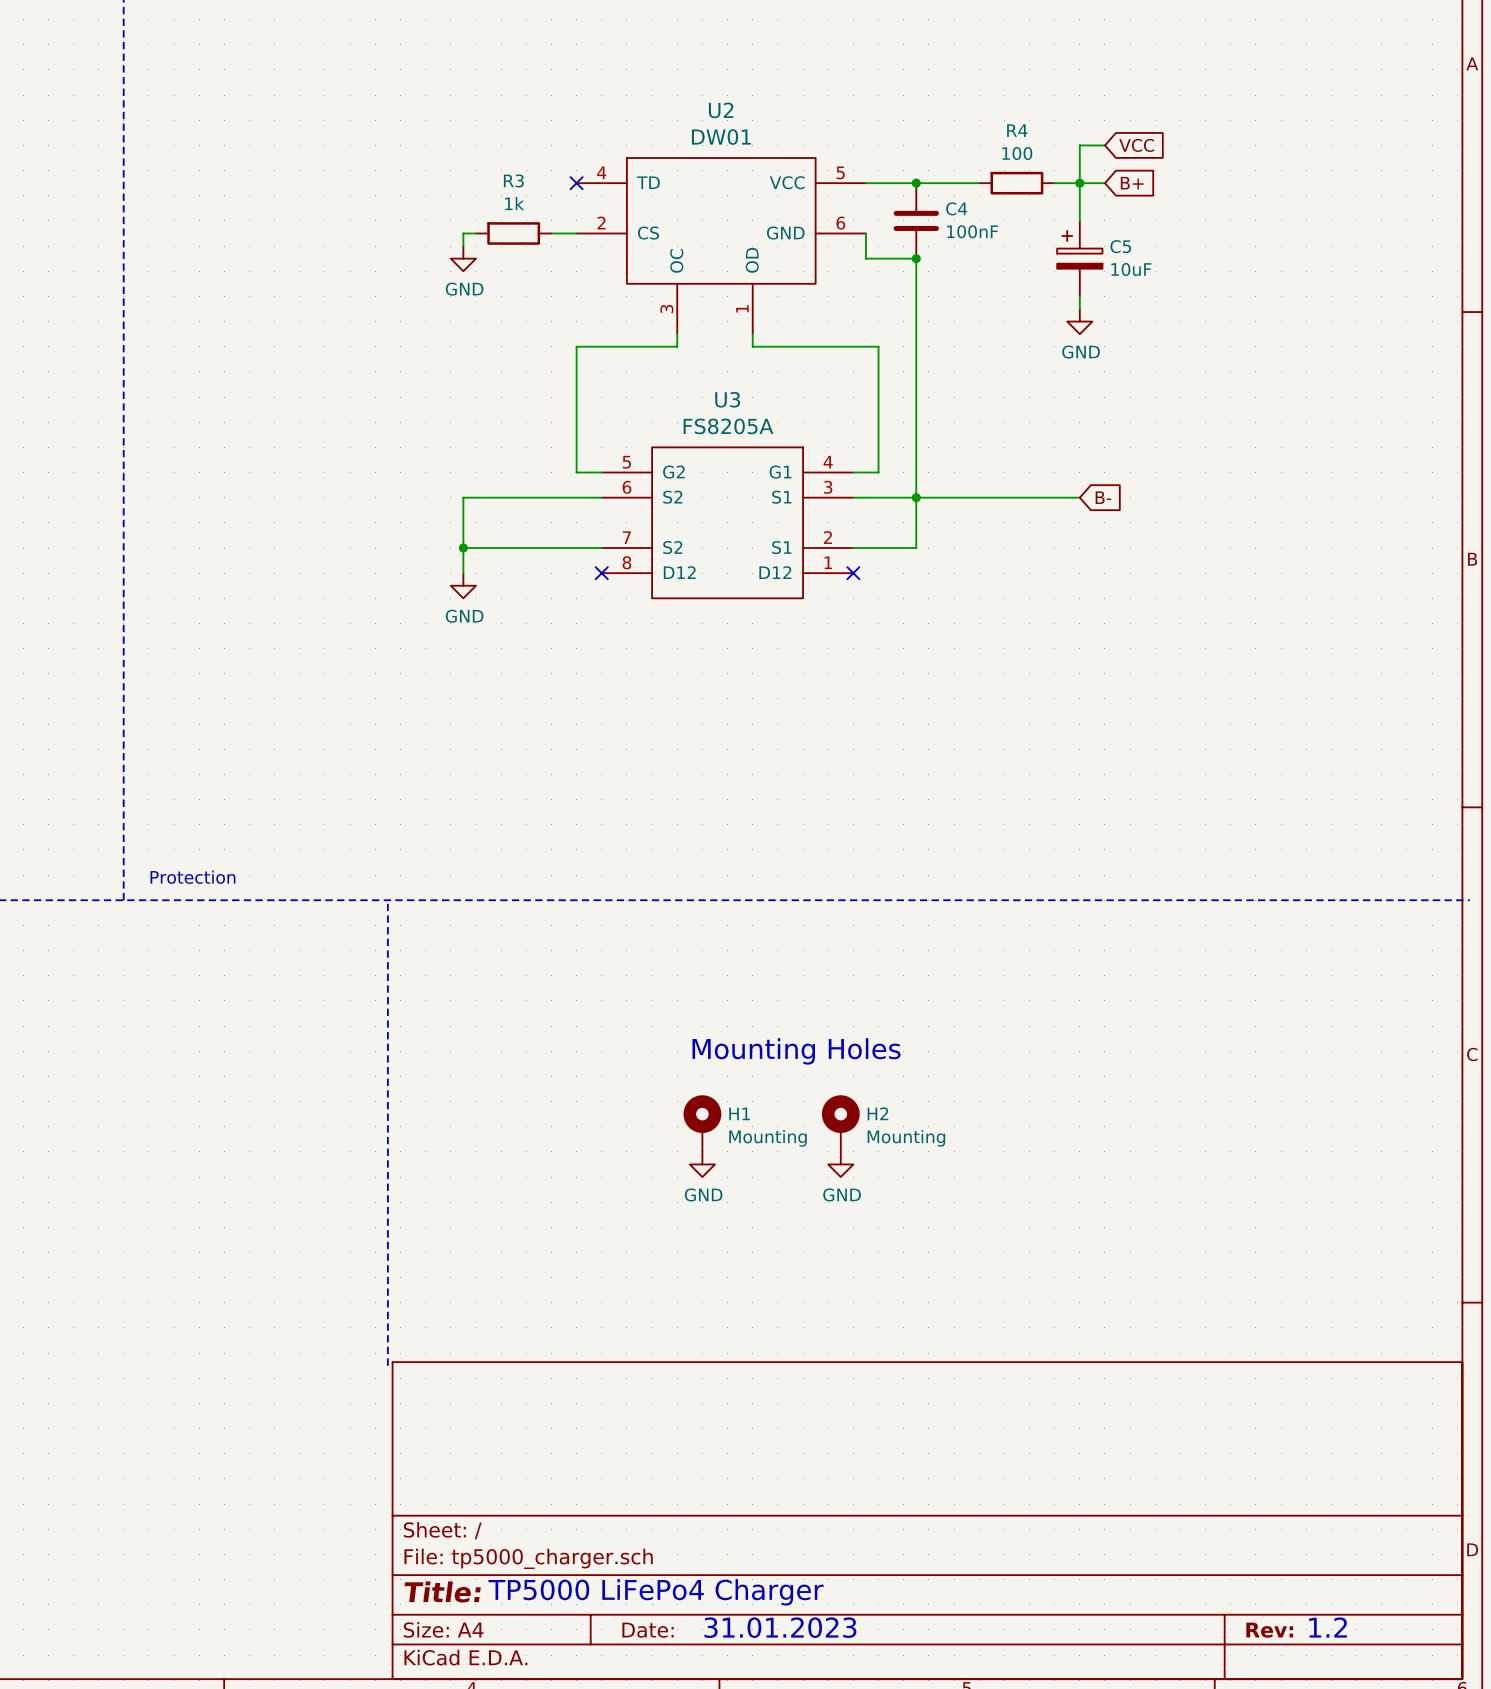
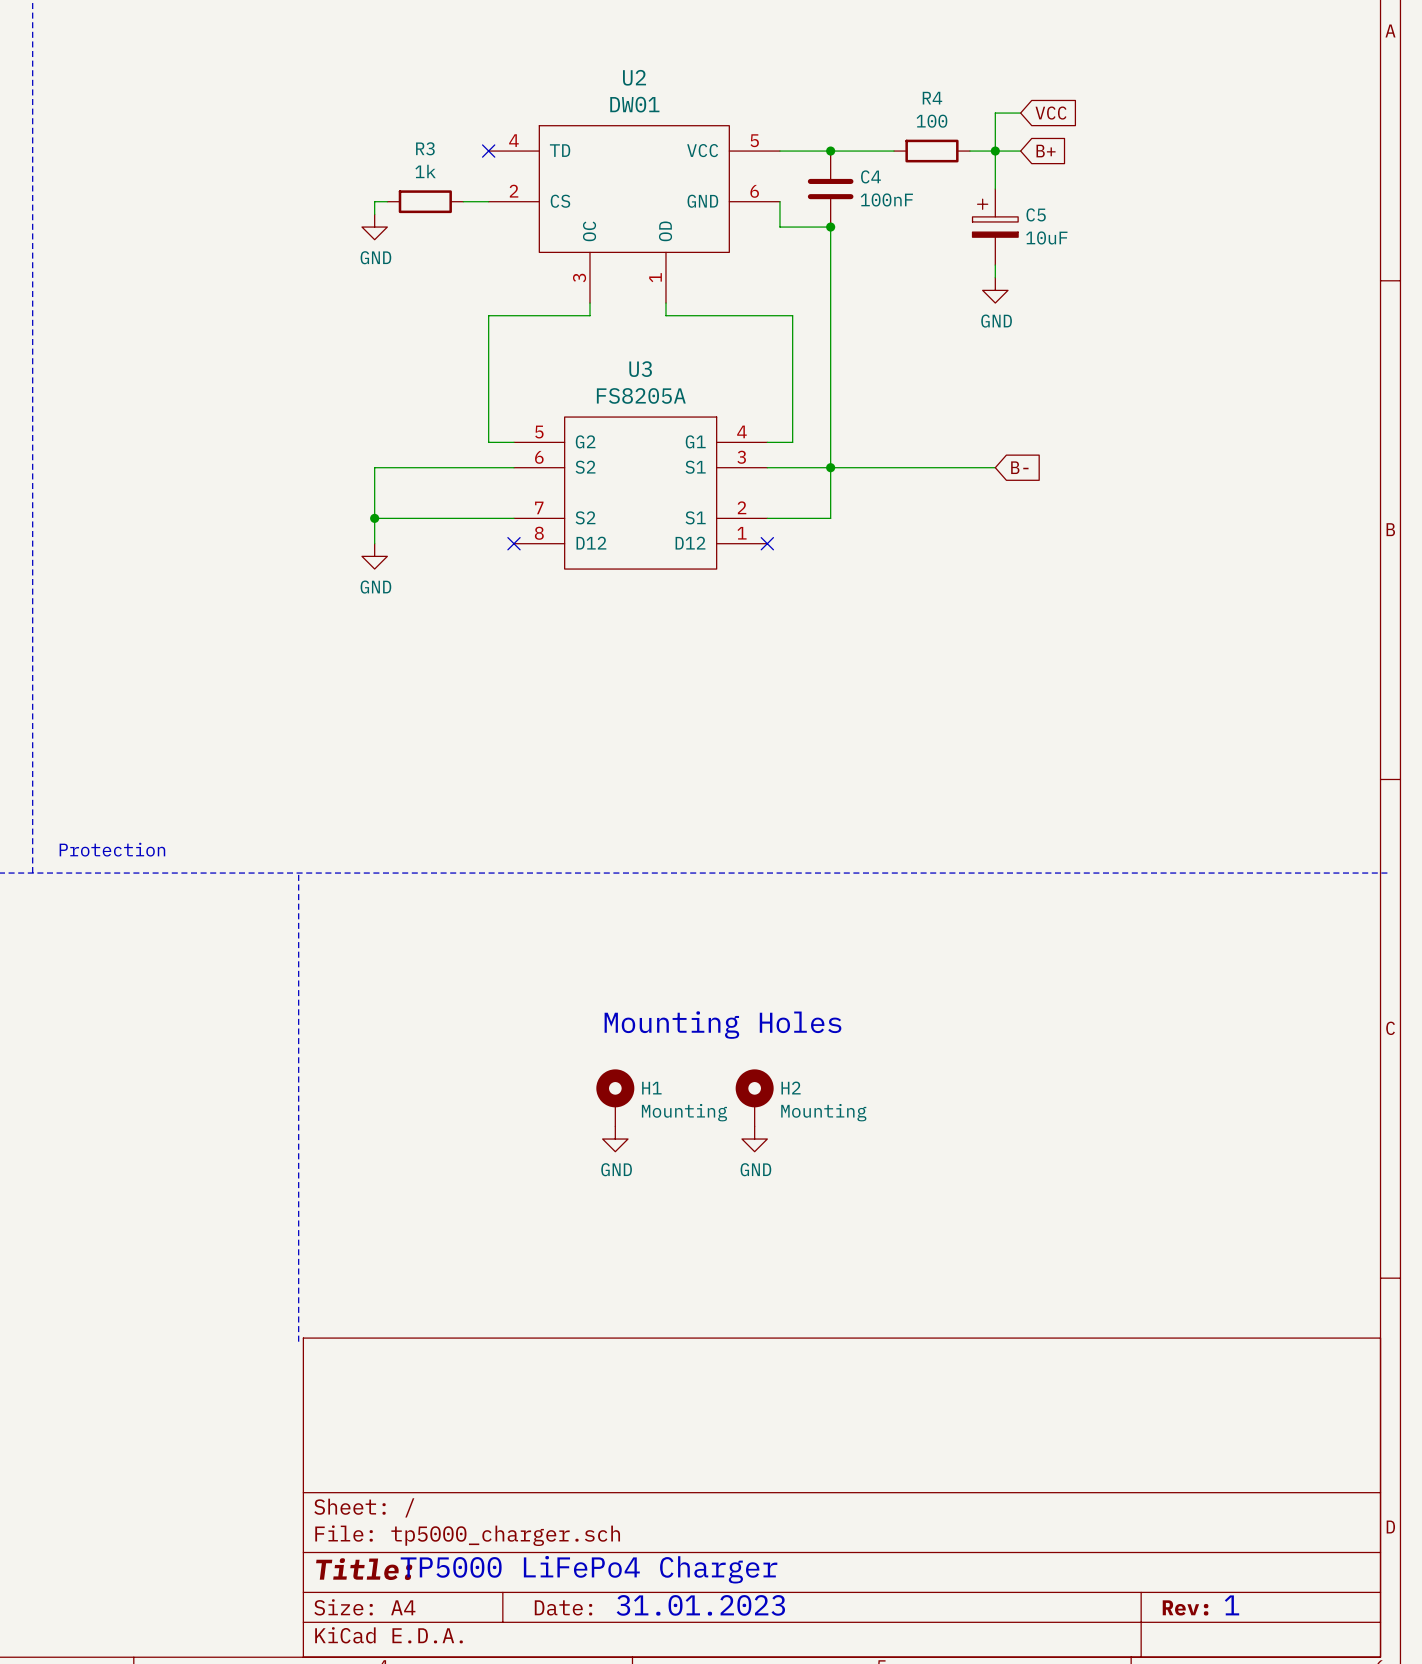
text: 1.2 (1328, 1627) -> 1 (1232, 1605)

